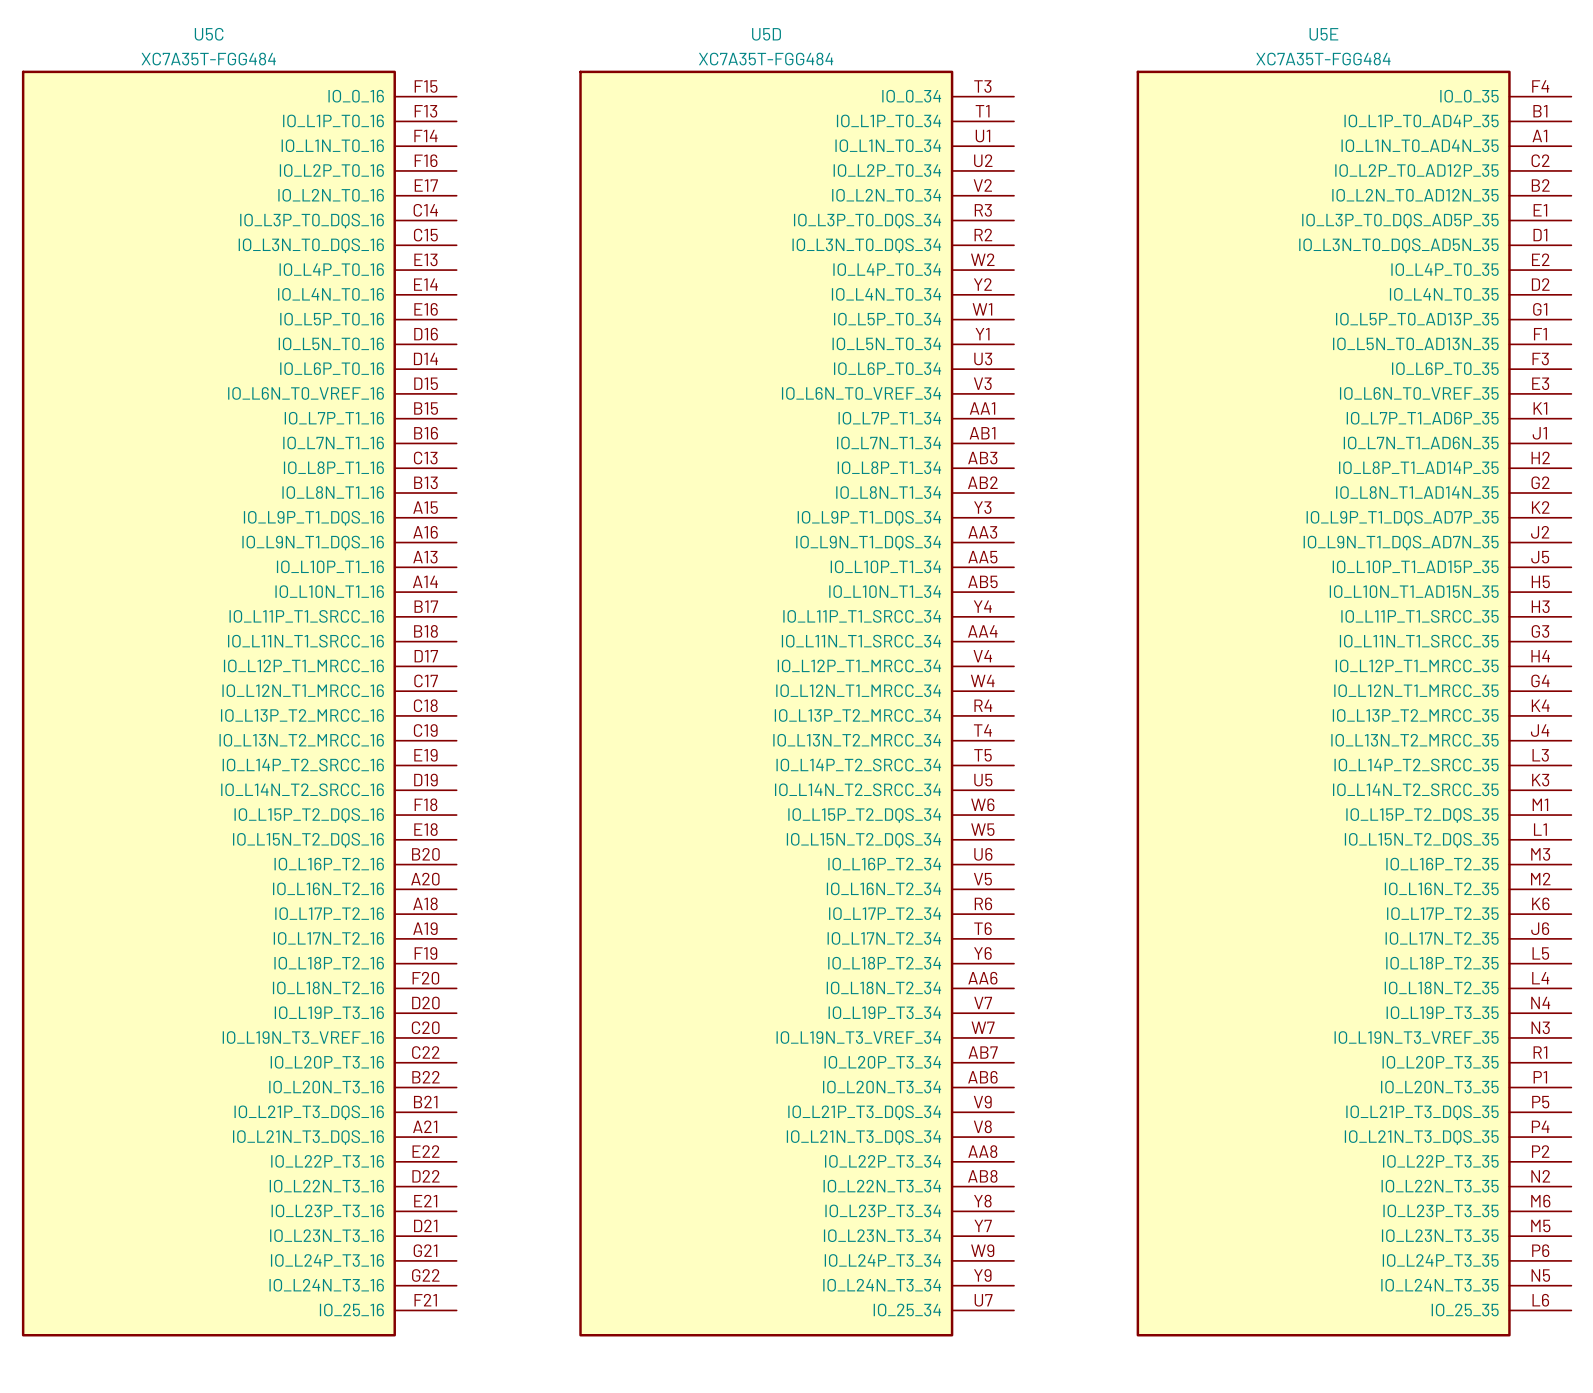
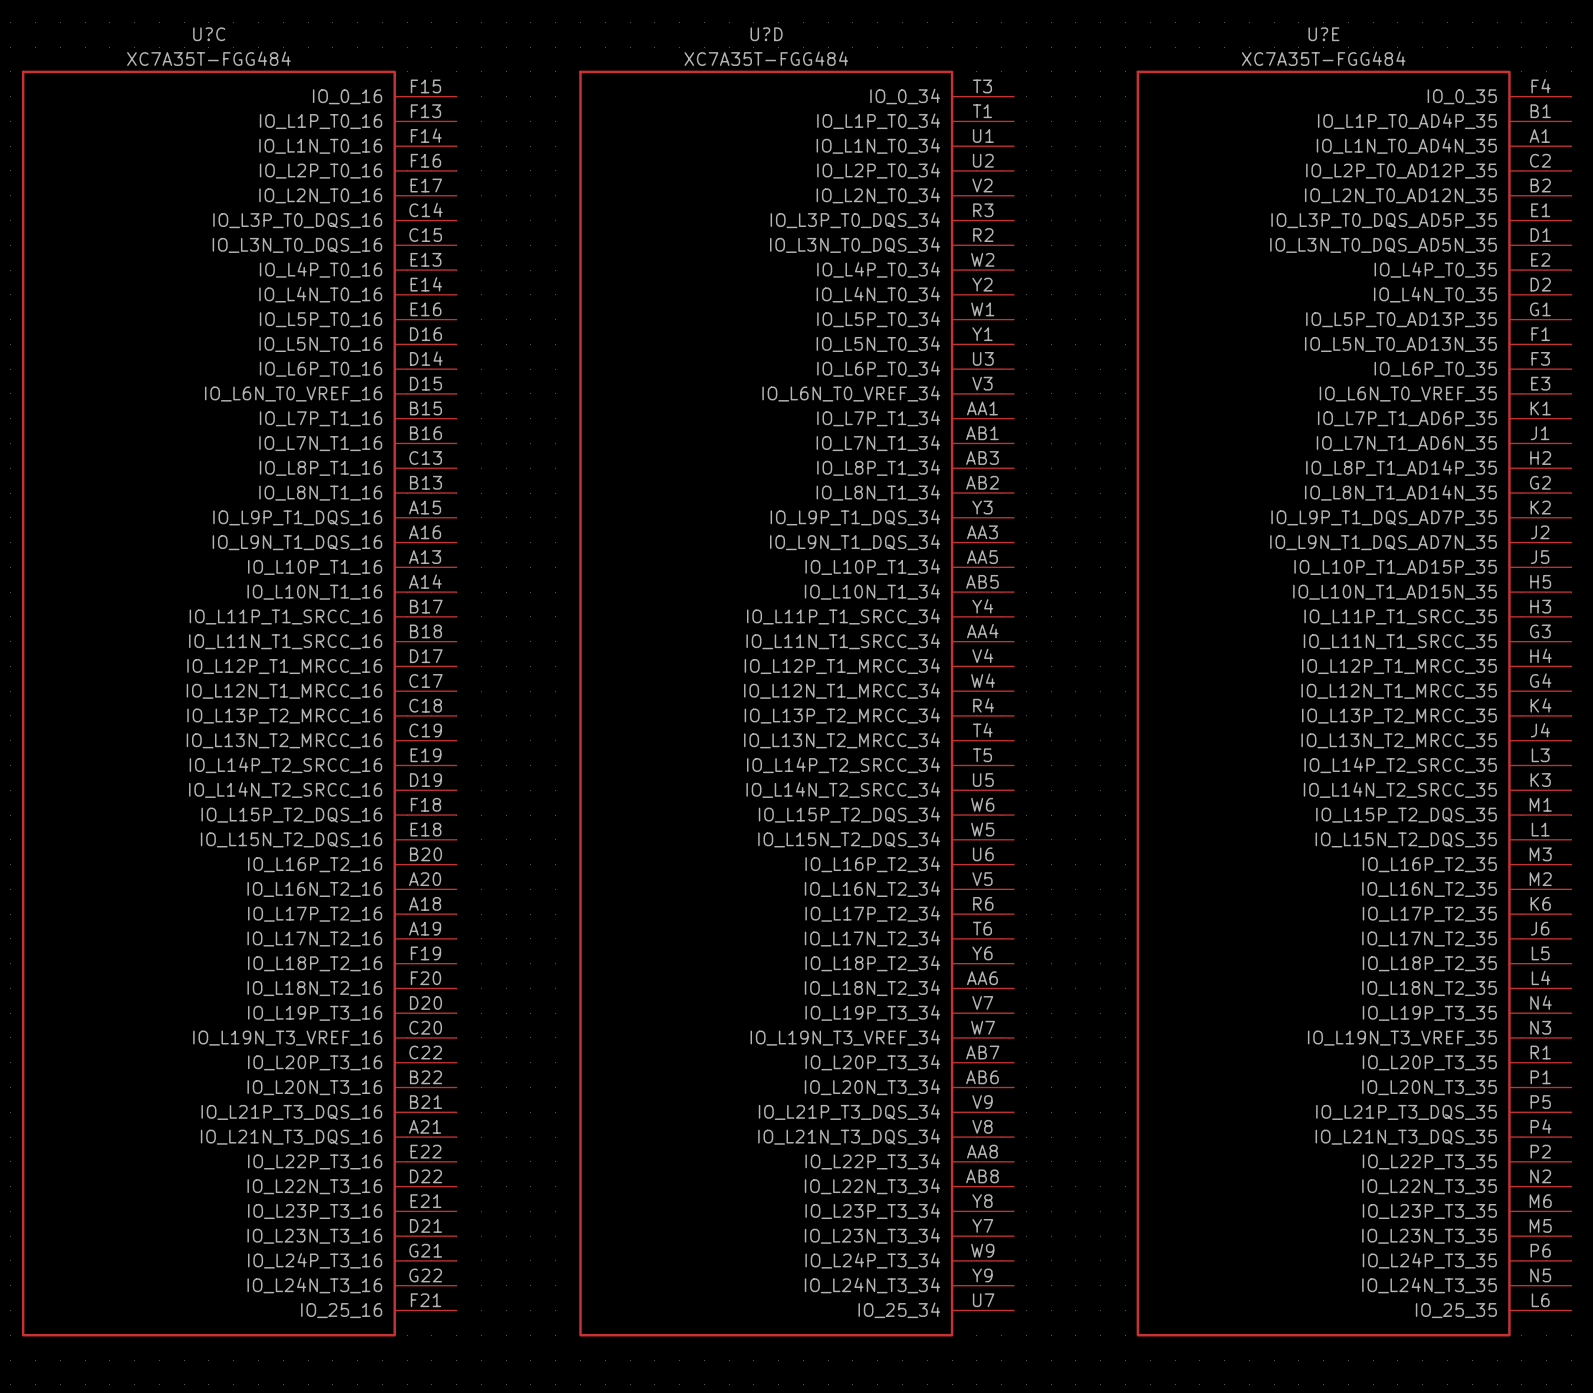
U5C name: U5C (209, 34) -> U?C (209, 34)
U5D name: U5D (766, 34) -> U?D (766, 34)
U5E name: U5E (1323, 34) -> U?E (1323, 34)

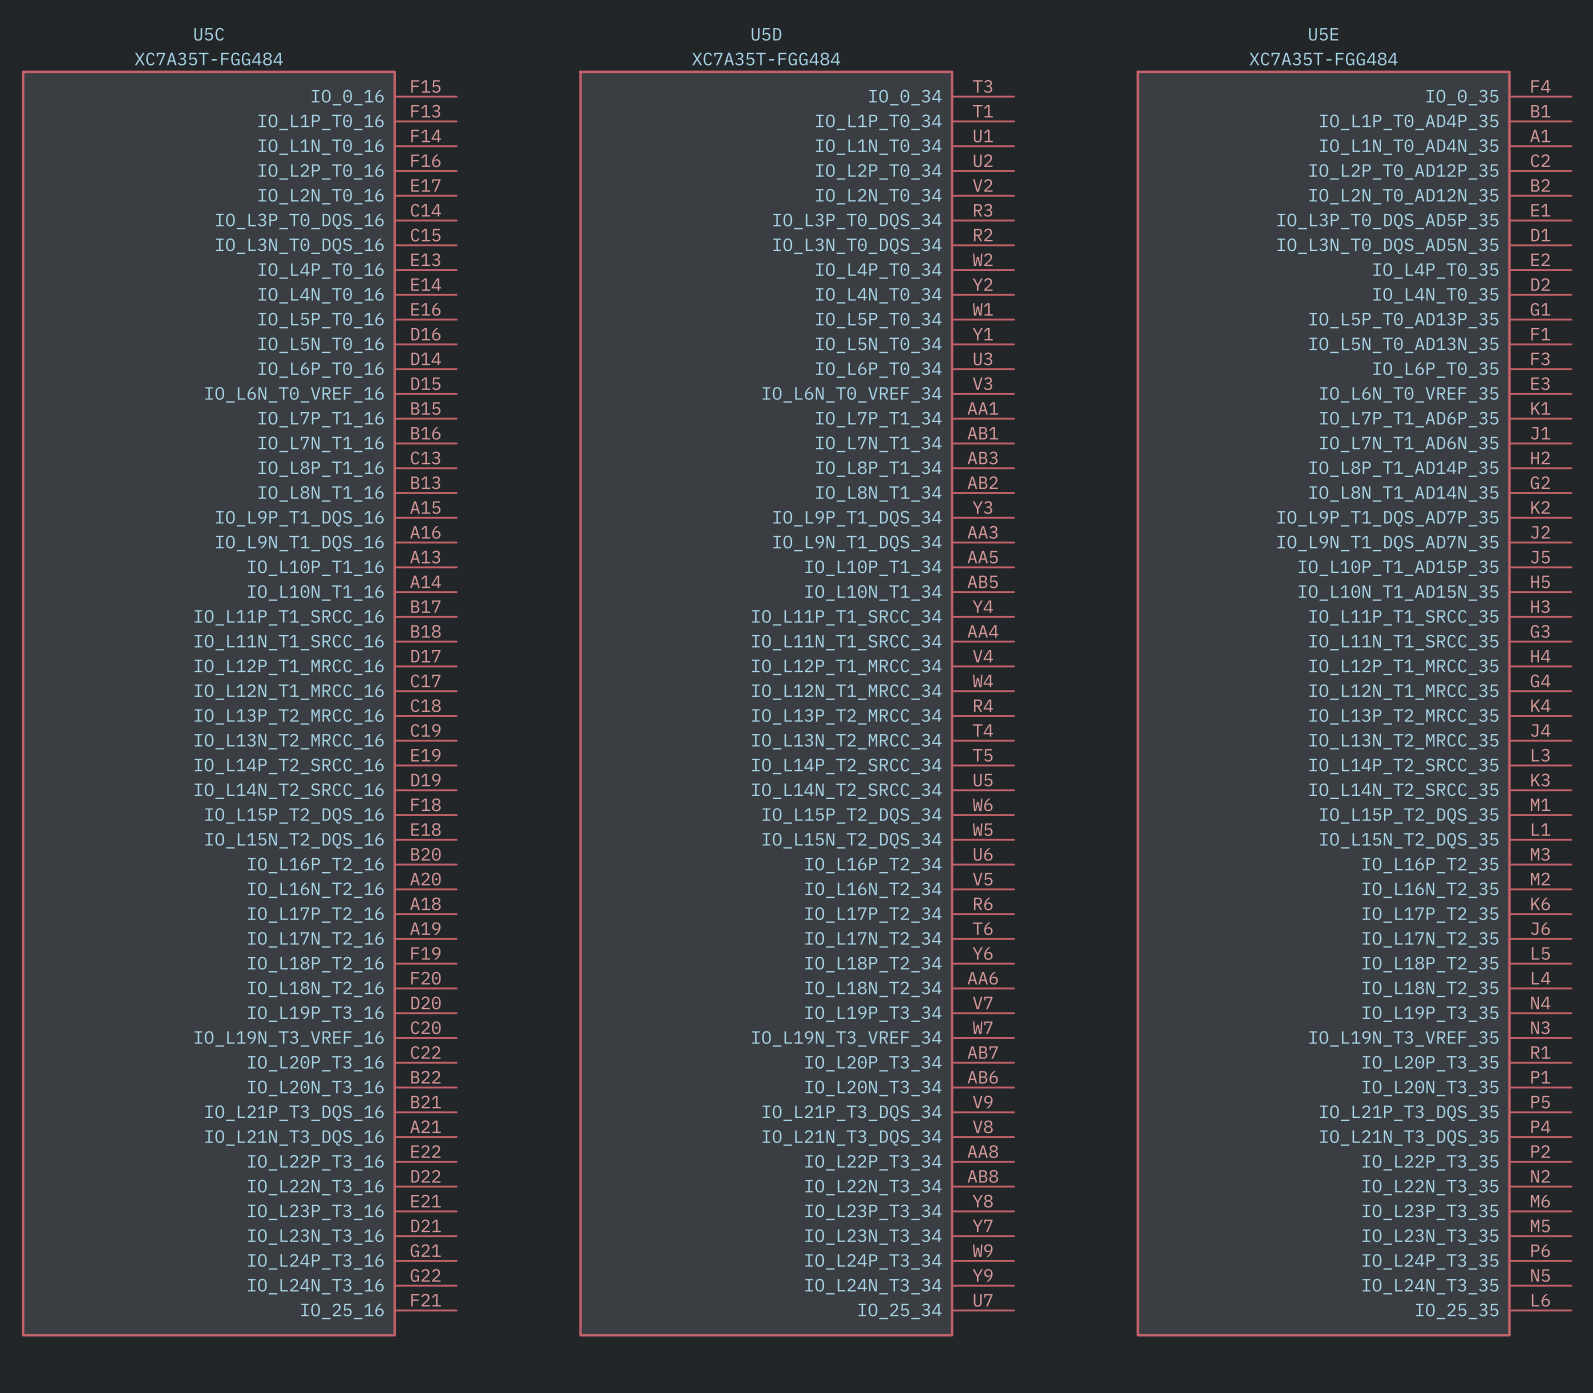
U?C name: U?C (209, 34) -> U5C (209, 34)
U?D name: U?D (766, 34) -> U5D (766, 34)
U?E name: U?E (1323, 34) -> U5E (1323, 34)

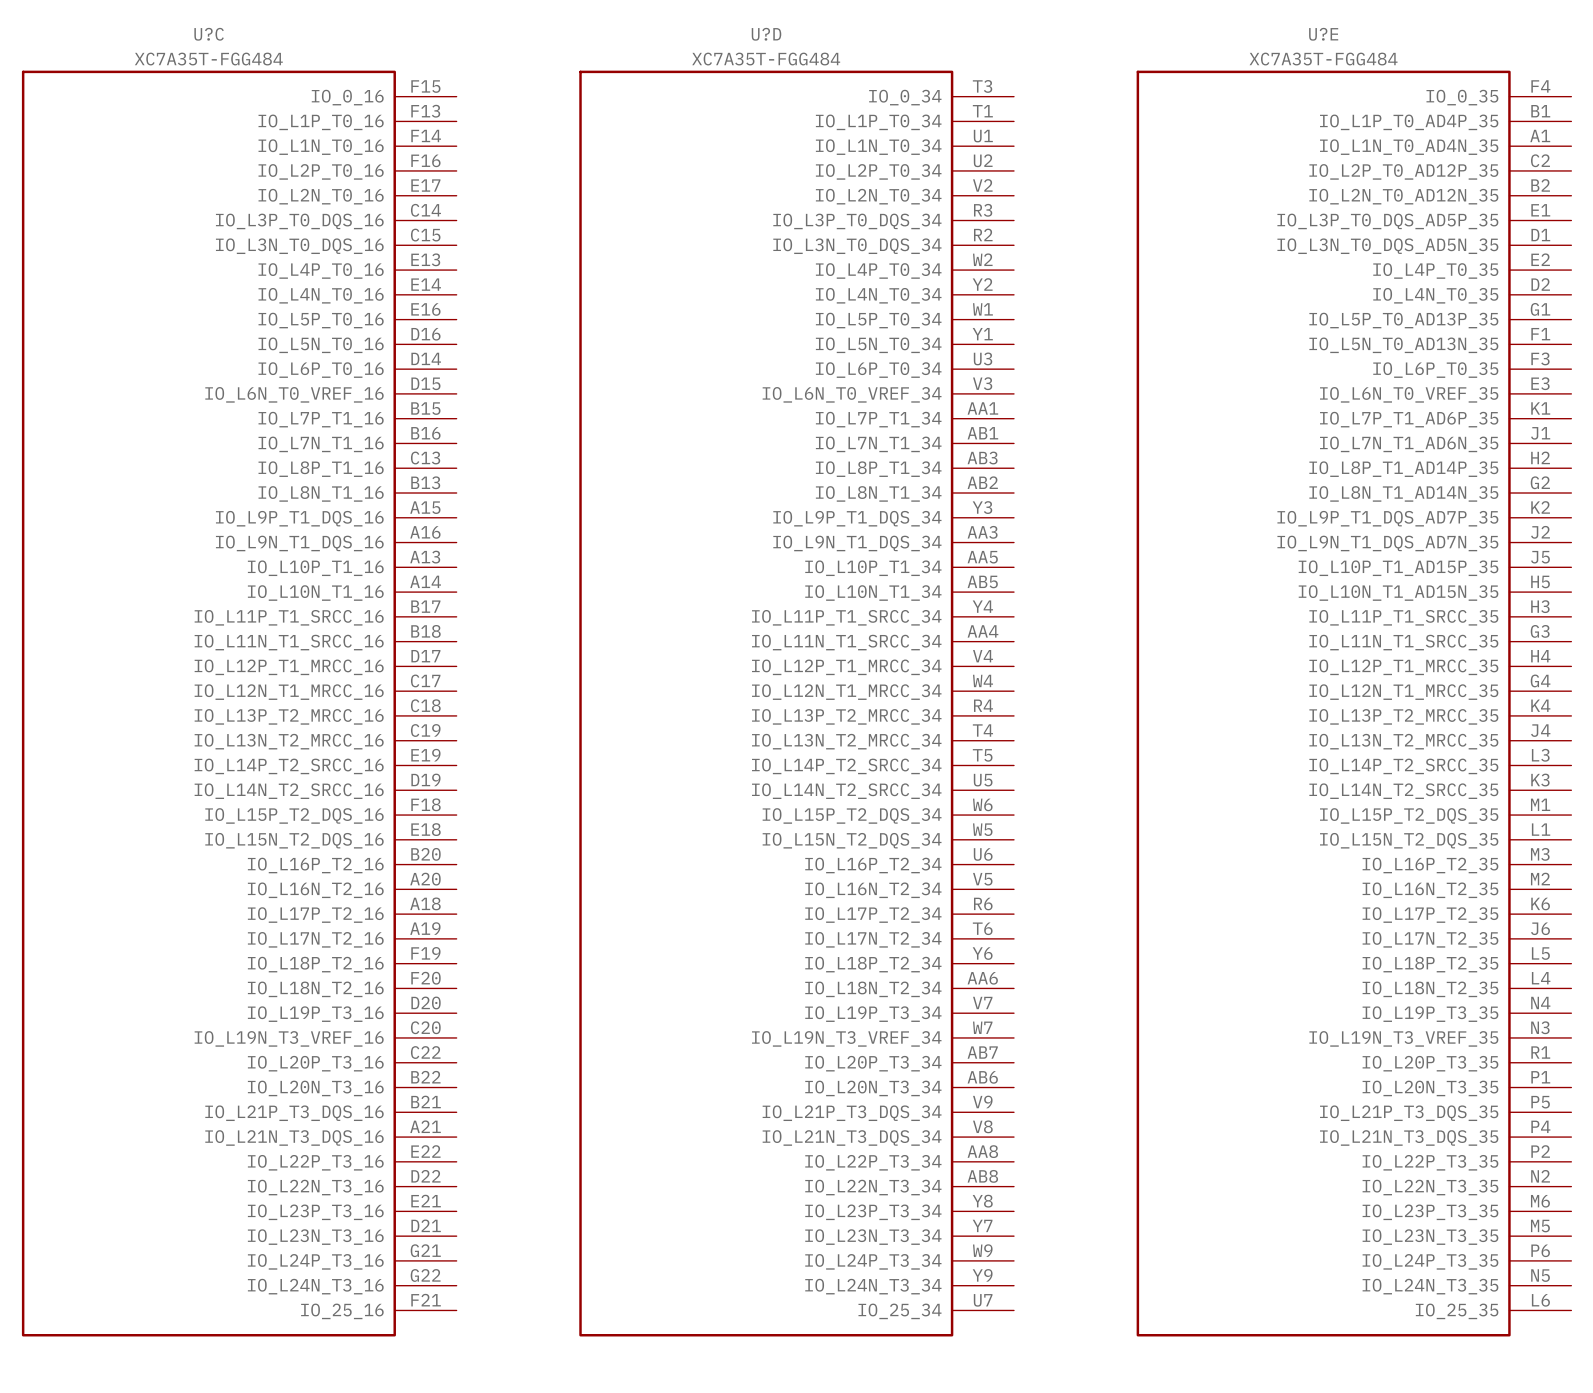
U5C name: U5C (209, 34) -> U?C (209, 34)
U5D name: U5D (766, 34) -> U?D (766, 34)
U5E name: U5E (1323, 34) -> U?E (1323, 34)

